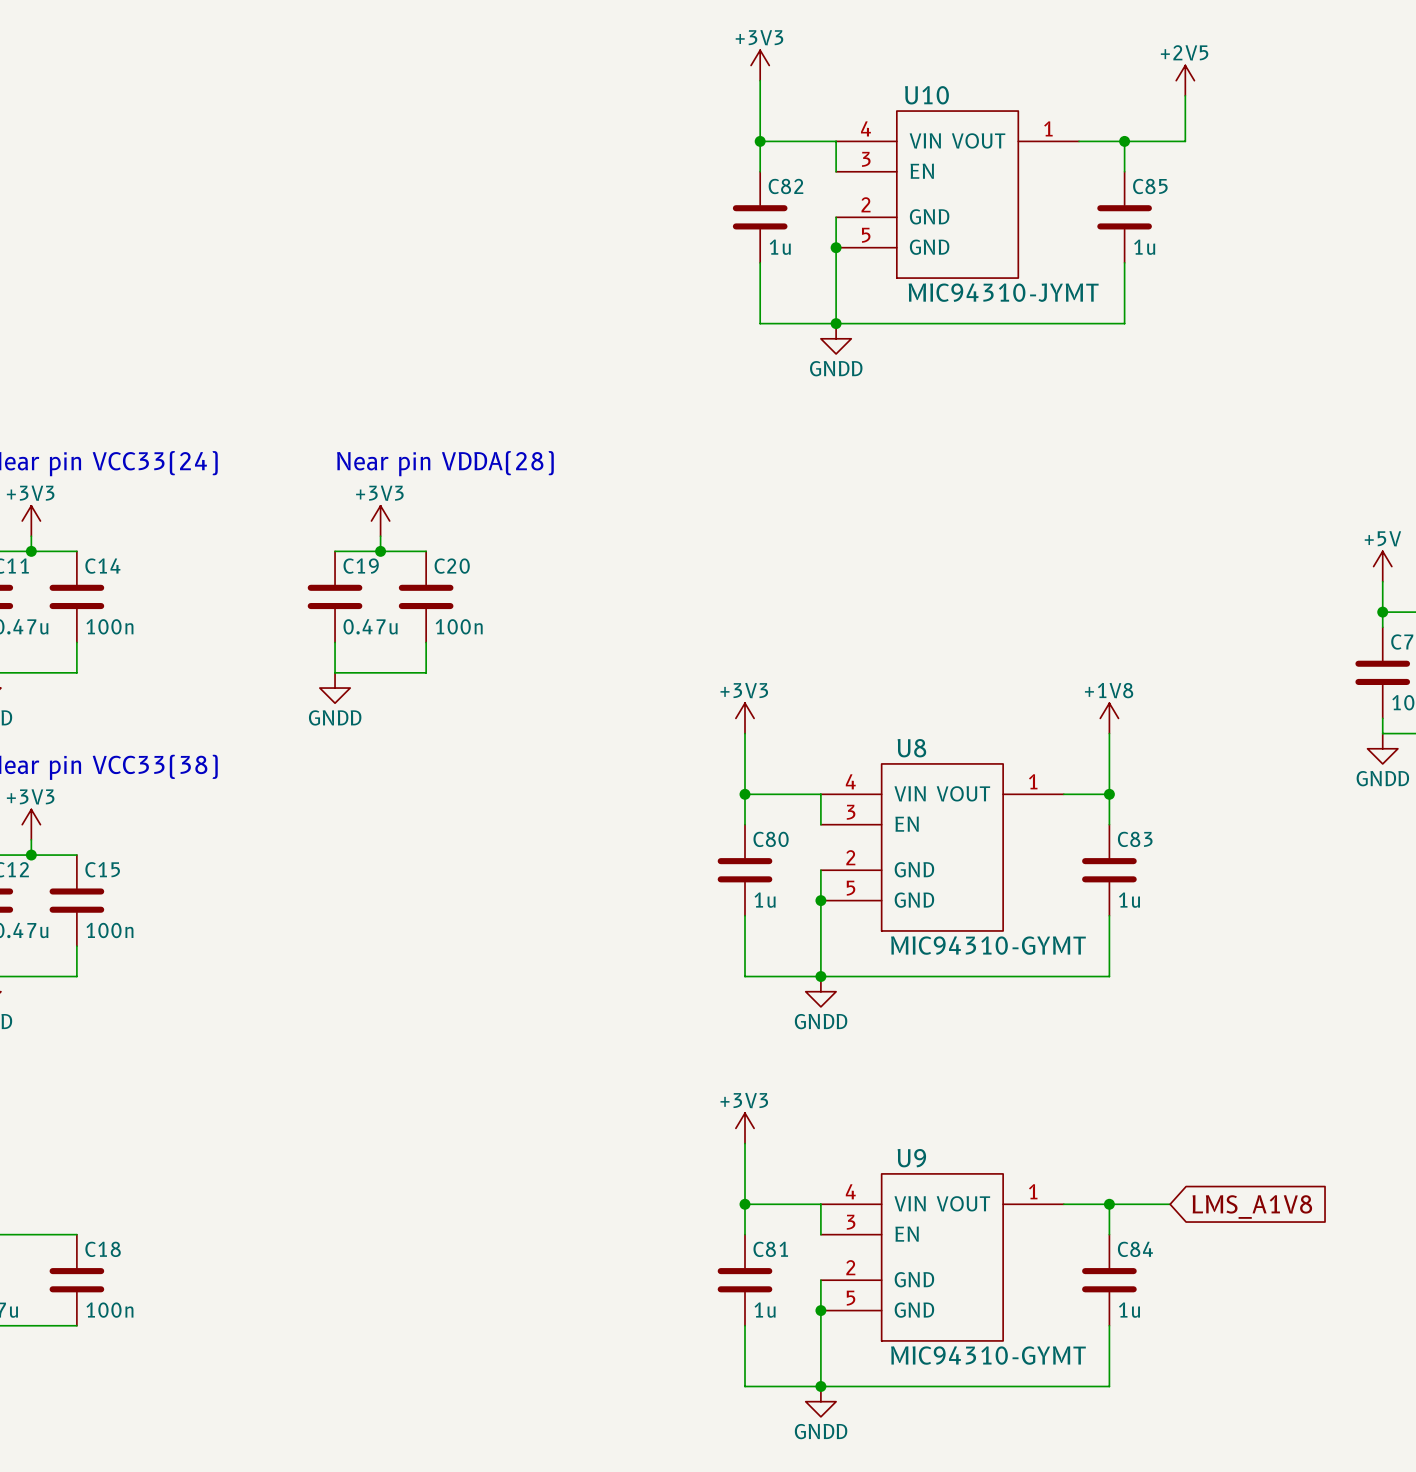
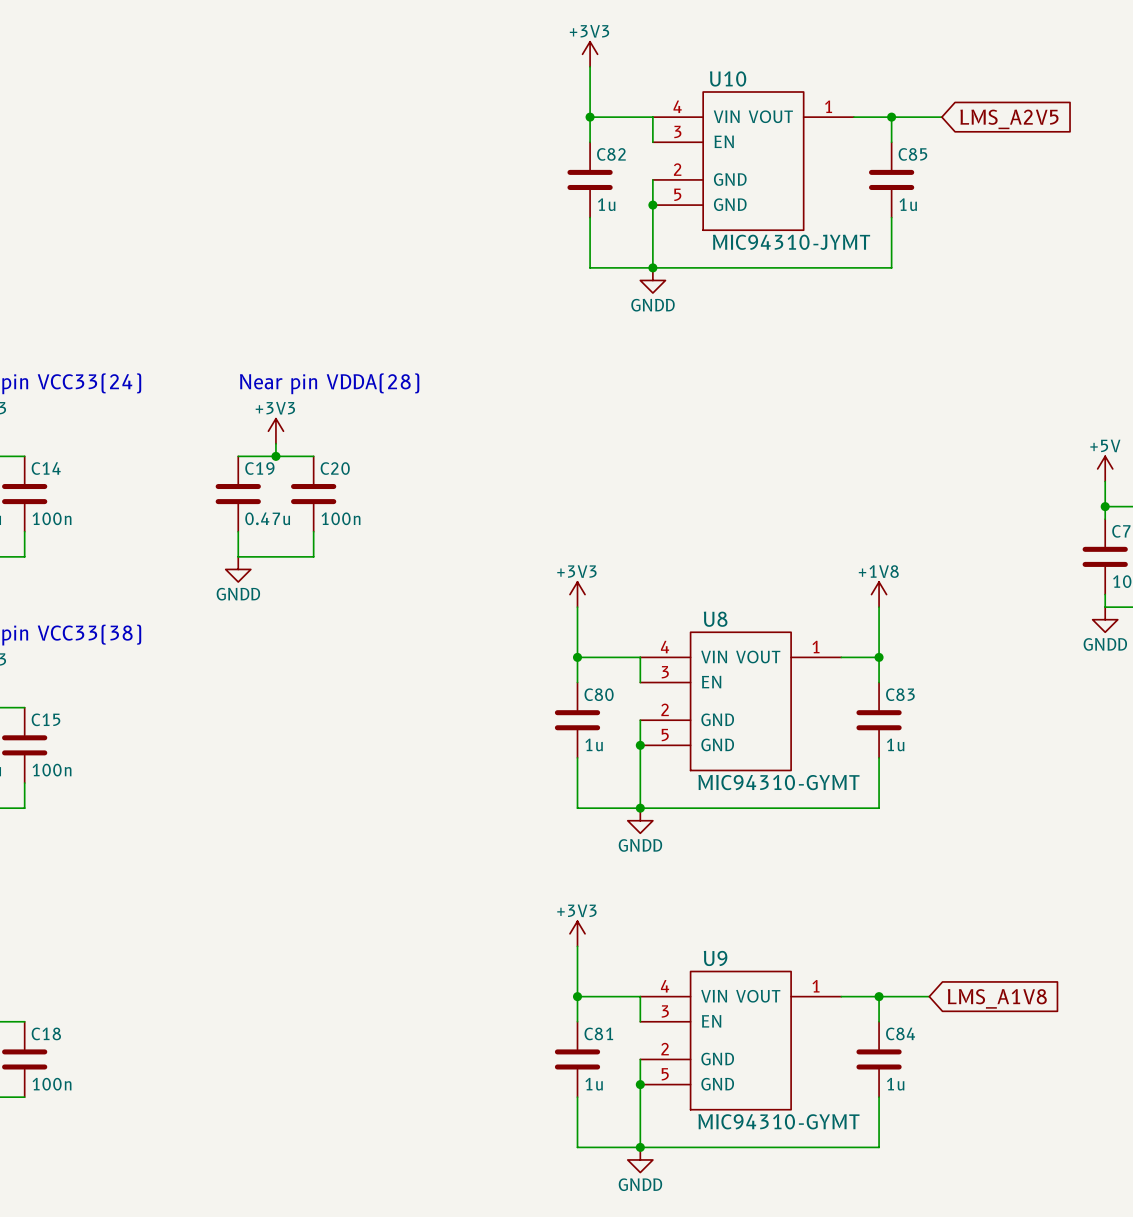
power symbol: +2V5 (1185, 80) -> none
wire: (1185, 95) (1185, 141) -> none
global label: none -> LMS_A2V5 (1009, 119)

